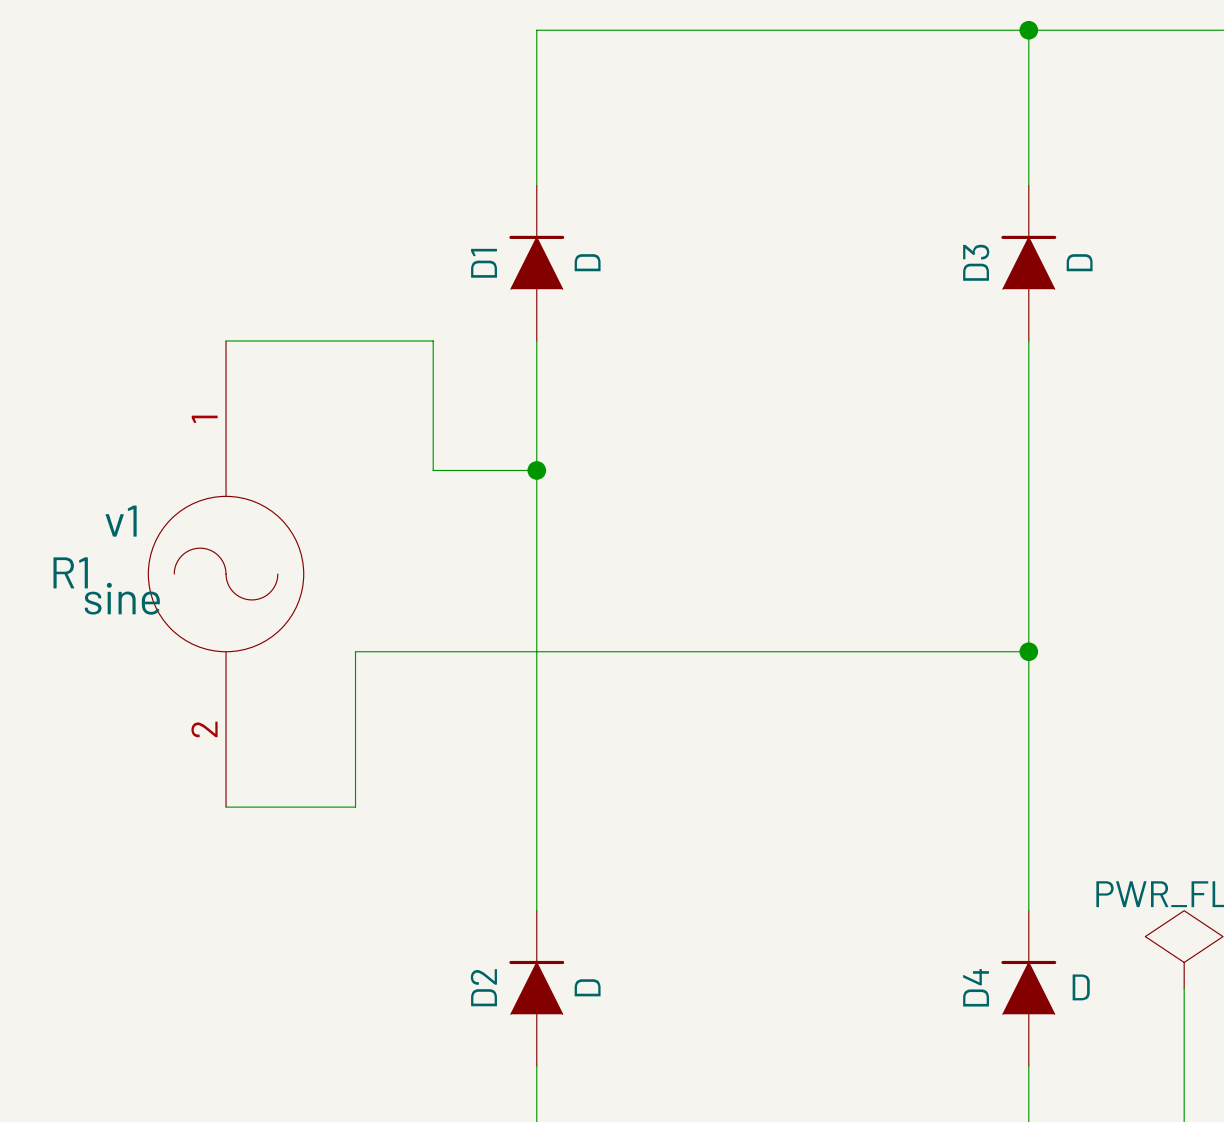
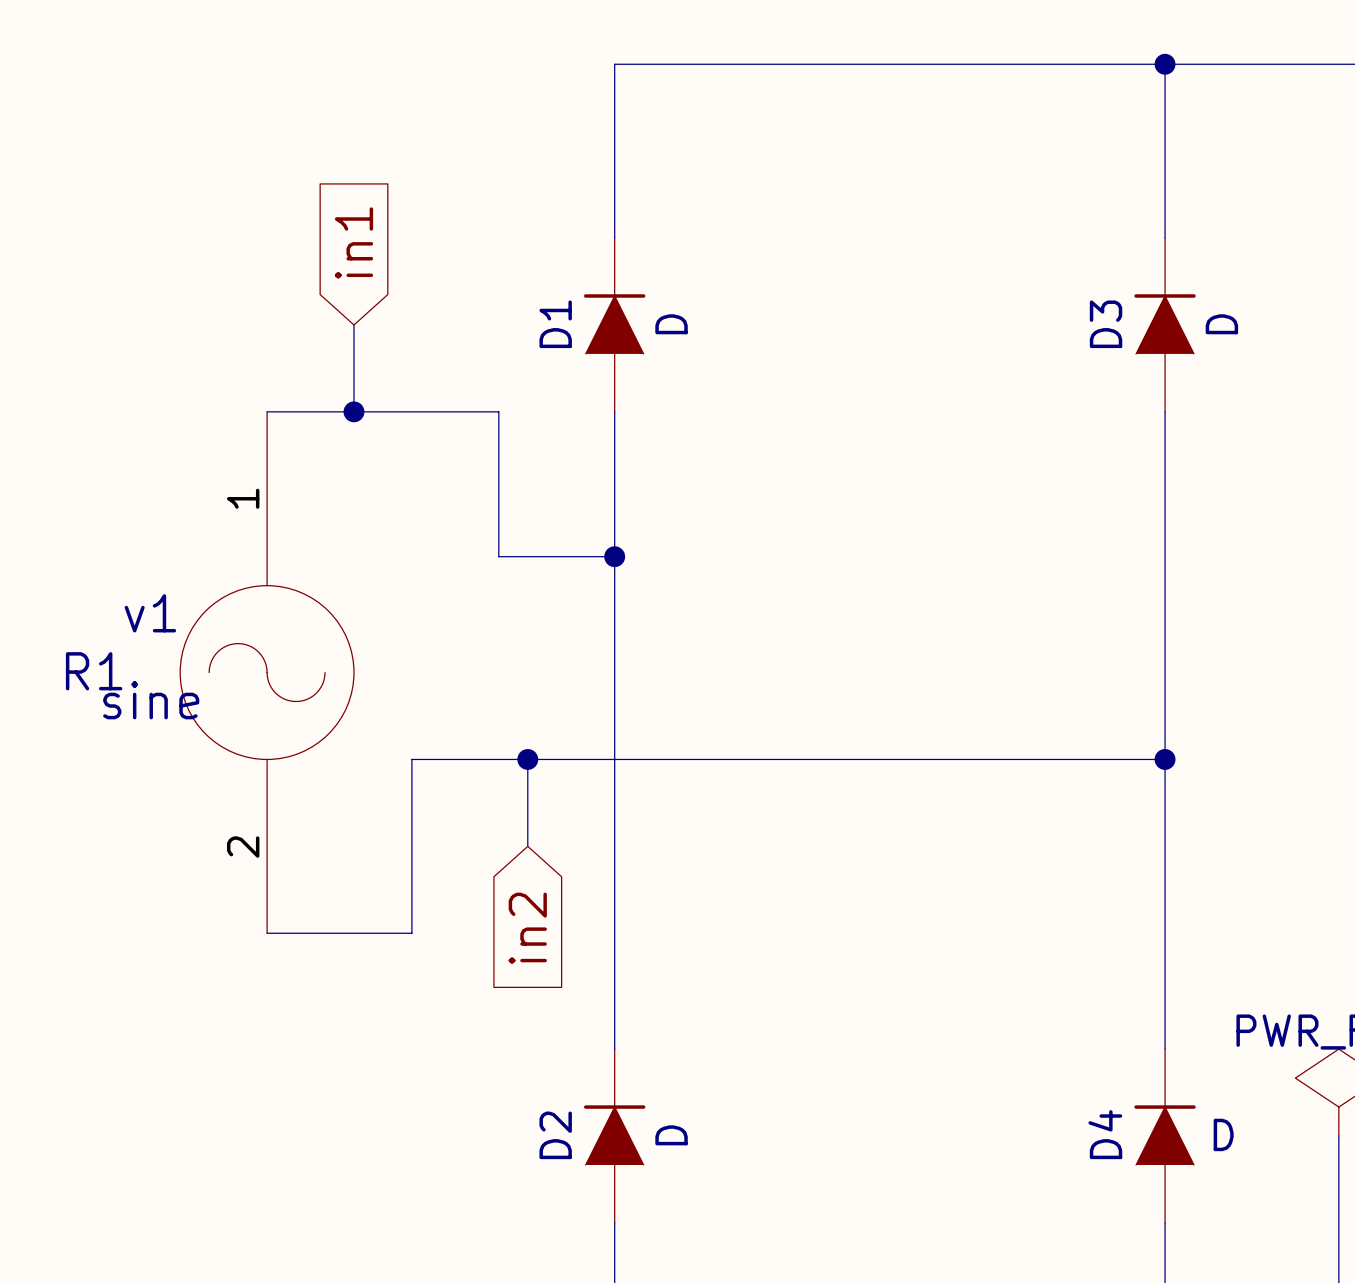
global label: none -> in1 (353, 243)
wire: none -> (353, 324) (353, 411)
junction: none -> (353, 411)
wire: none -> (527, 759) (527, 846)
junction: none -> (527, 759)
global label: none -> in2 (527, 928)

